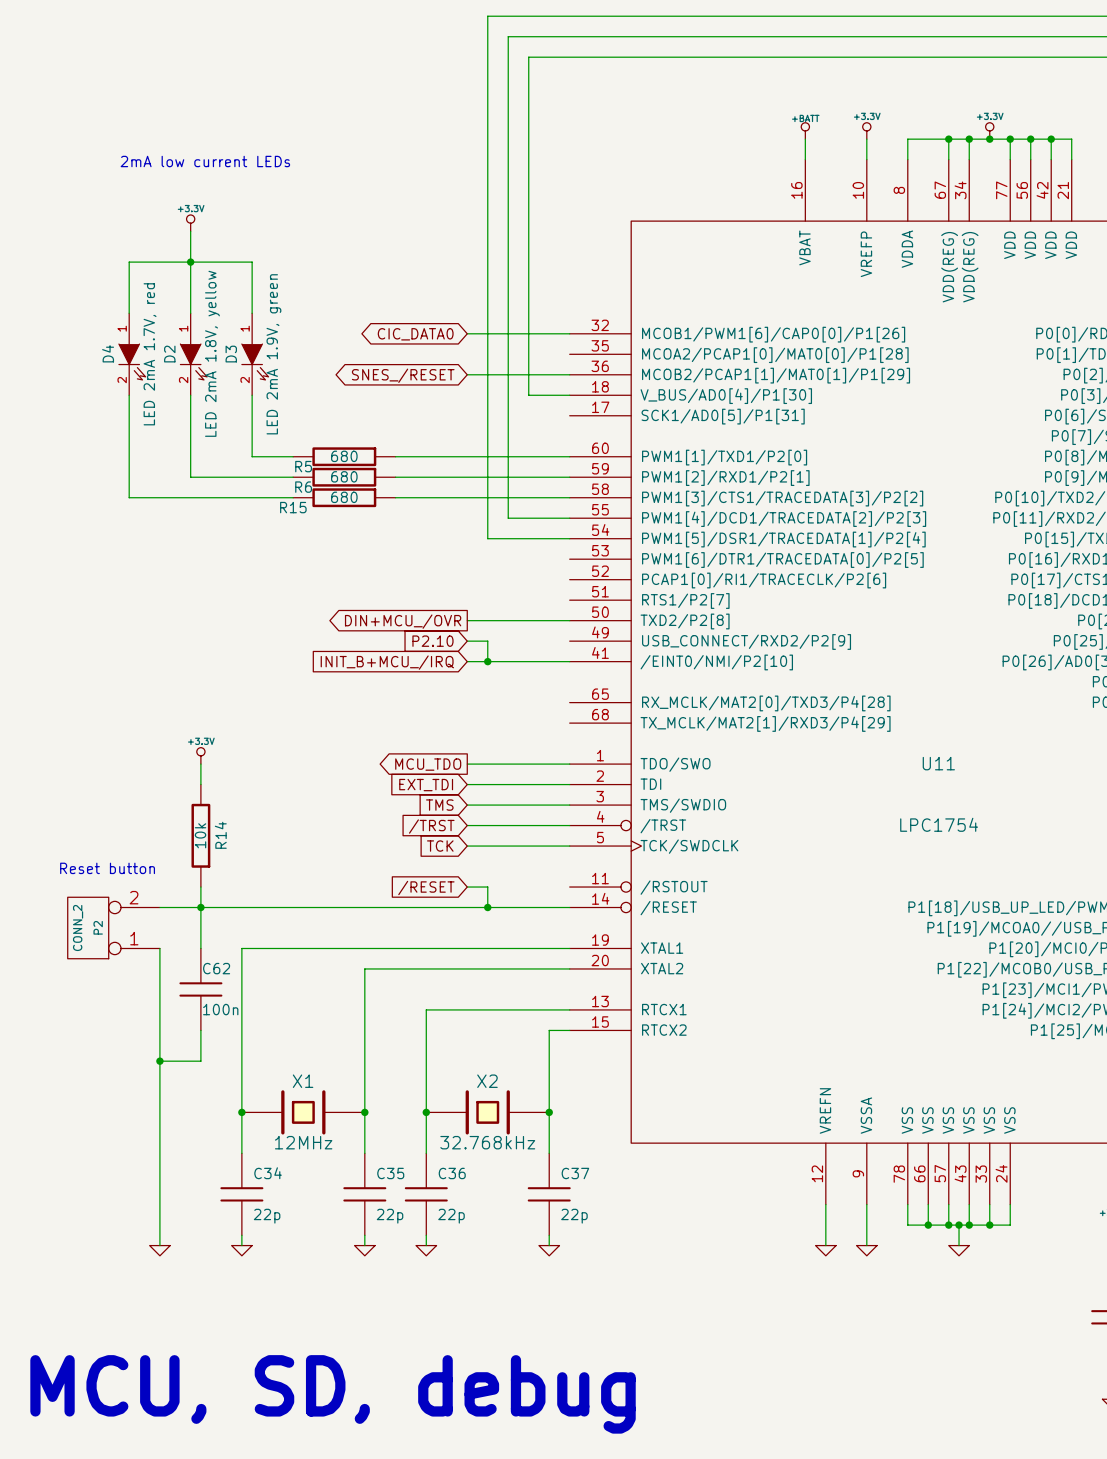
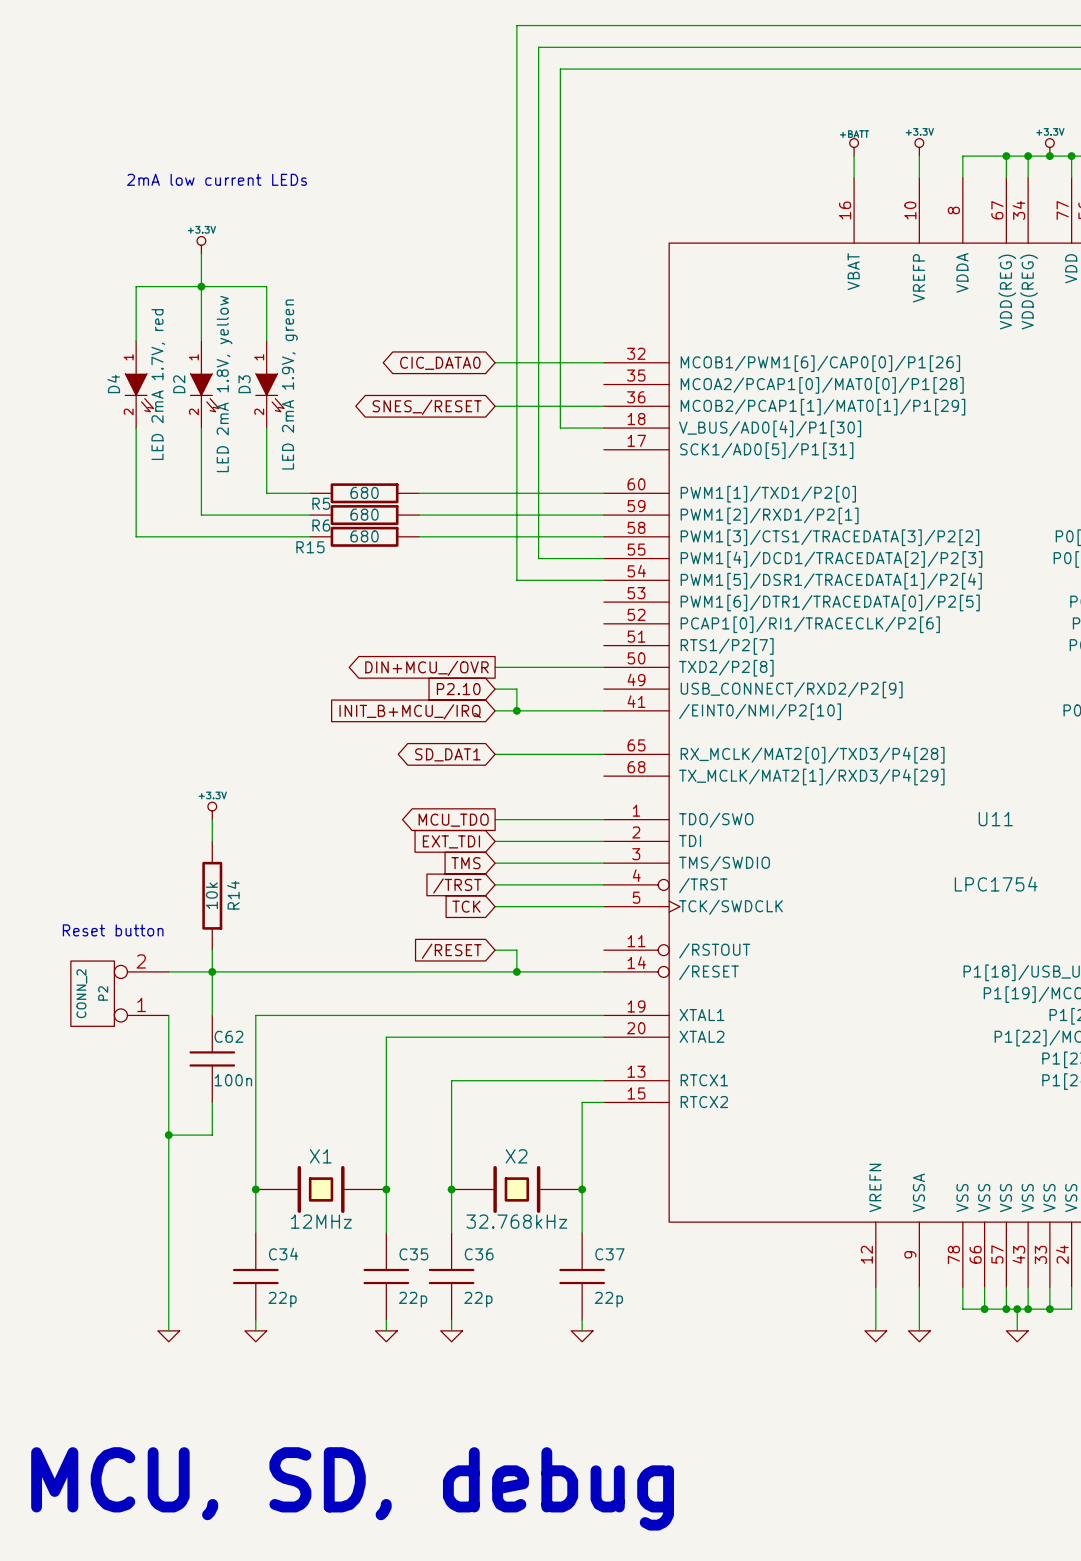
wire: none -> (495, 754) (603, 754)
global label: none -> SD_DAT1 (447, 754)

